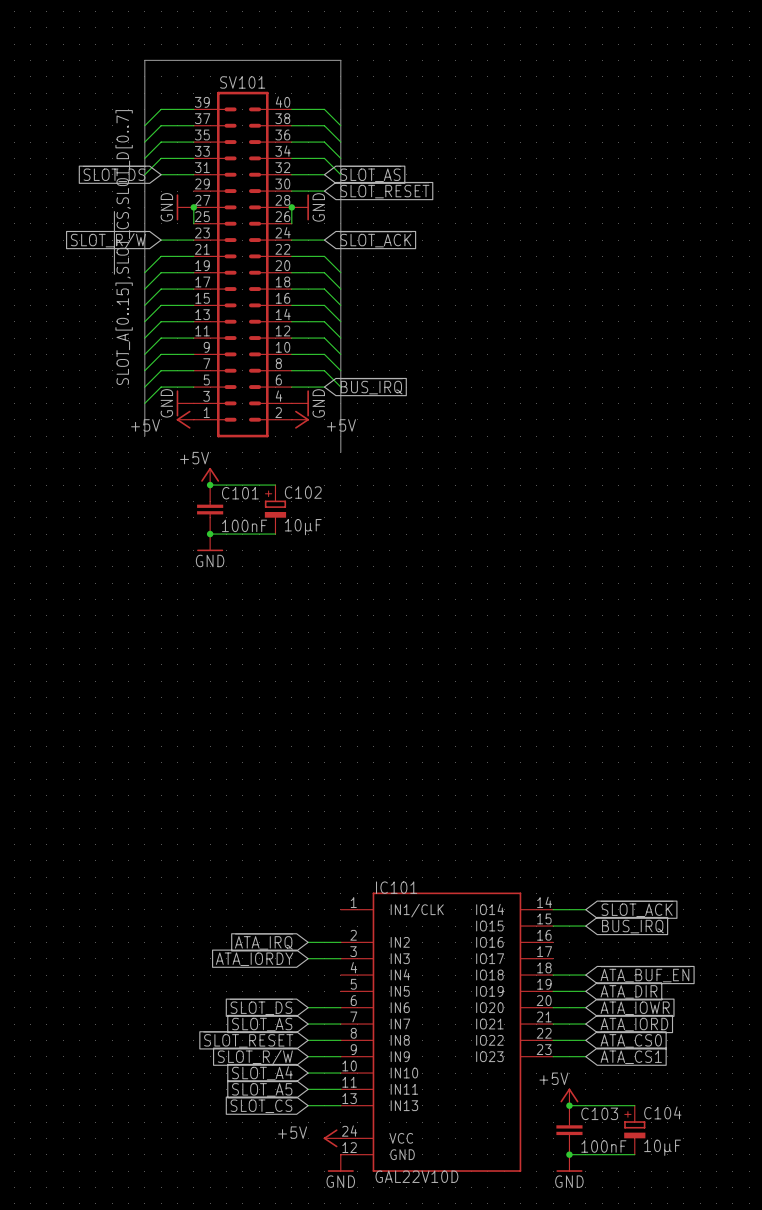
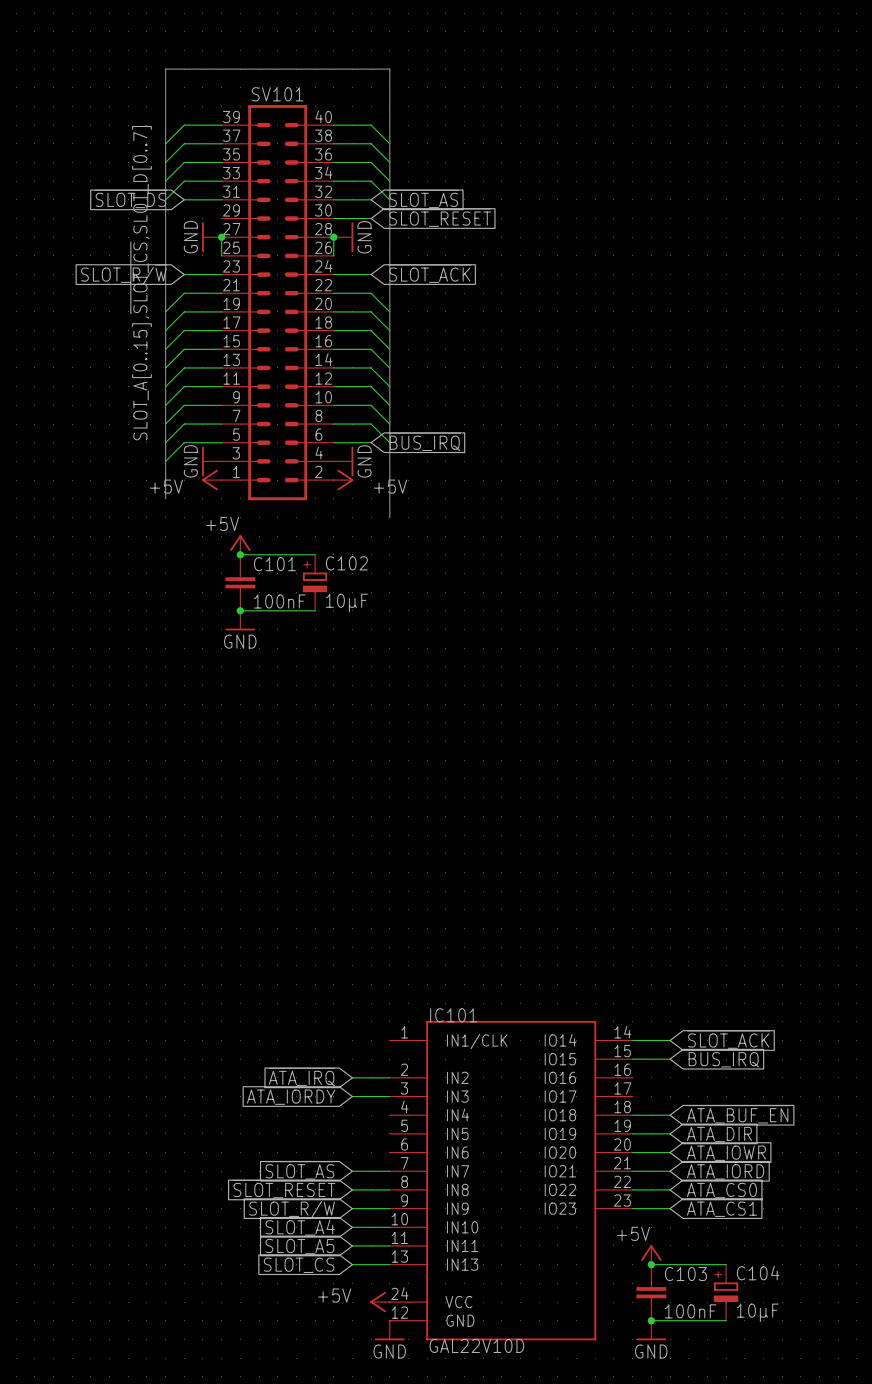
global label: ~{SLOT_DS} (261, 1006) -> none
wire: (308, 1007) (340, 1007) -> none

